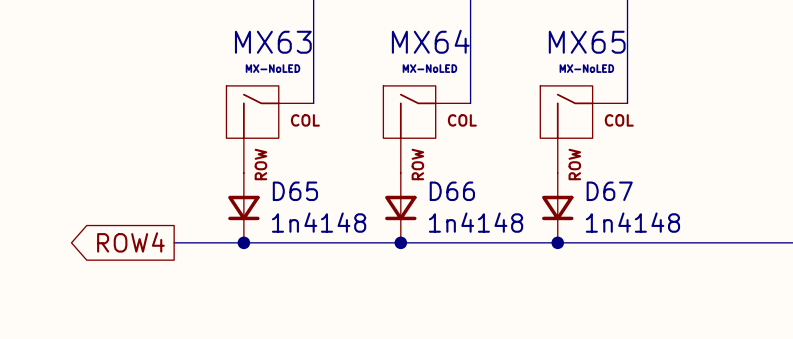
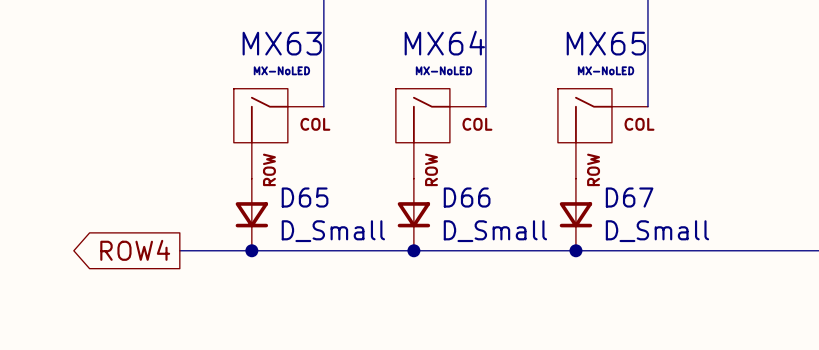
D65 value: 1n4148 (319, 222) -> D_Small (333, 231)
D66 value: 1n4148 (476, 222) -> D_Small (495, 231)
D67 value: 1n4148 (632, 222) -> D_Small (657, 231)

